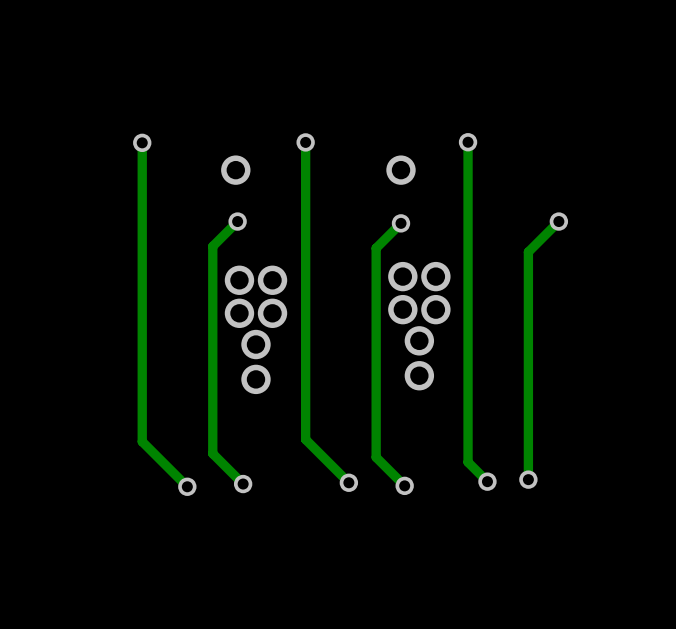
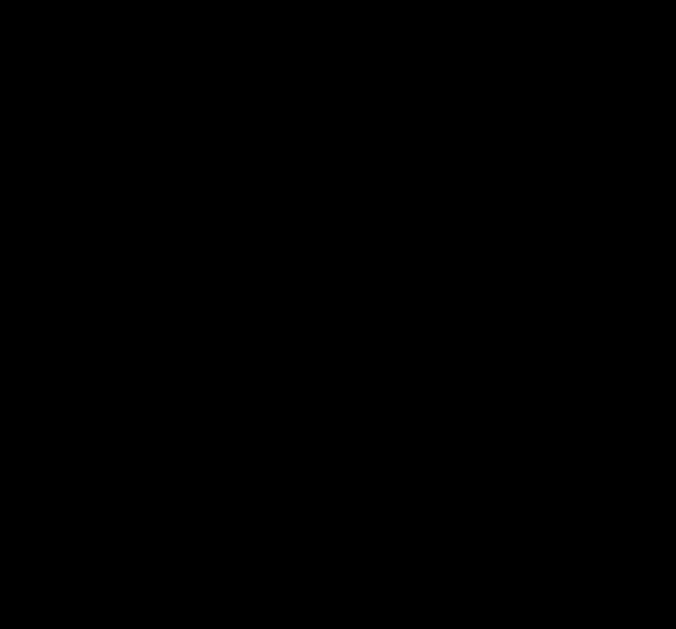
track: (142, 142) (142, 441) (187, 486) -> none
via: (142, 142) -> none
track: (305, 142) (305, 439) (348, 482) -> none
via: (305, 142) -> none
track: (468, 142) (468, 462) (487, 481) -> none
via: (468, 142) -> none
via: (235, 170) -> none
via: (401, 170) -> none
track: (237, 221) (212, 246) (212, 453) (243, 484) -> none
via: (237, 221) -> none
track: (558, 221) (528, 252) (528, 479) -> none
via: (558, 221) -> none
track: (401, 223) (376, 248) (376, 457) (404, 485) -> none
via: (401, 223) -> none
via: (402, 276) -> none
via: (435, 276) -> none
via: (239, 280) -> none
via: (272, 280) -> none
via: (402, 309) -> none
via: (435, 309) -> none
via: (239, 313) -> none
via: (272, 313) -> none
via: (419, 340) -> none
via: (255, 344) -> none
via: (419, 375) -> none
via: (255, 379) -> none
via: (528, 479) -> none
via: (487, 481) -> none
via: (348, 482) -> none
via: (243, 484) -> none
via: (404, 485) -> none
via: (187, 486) -> none

